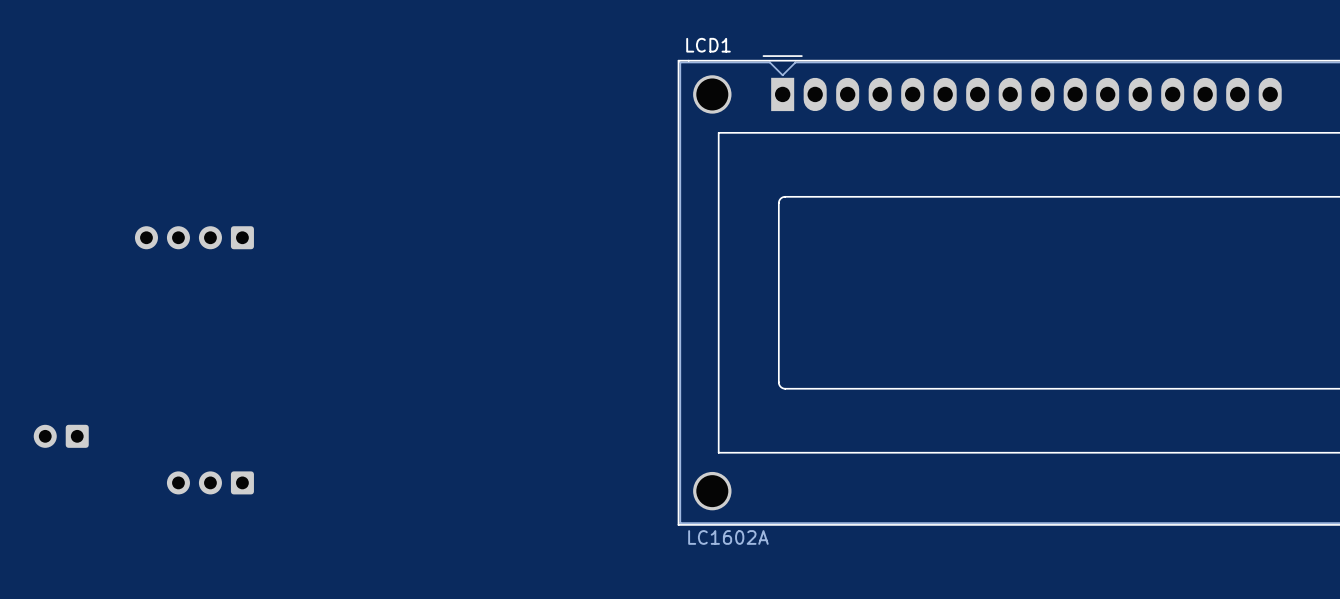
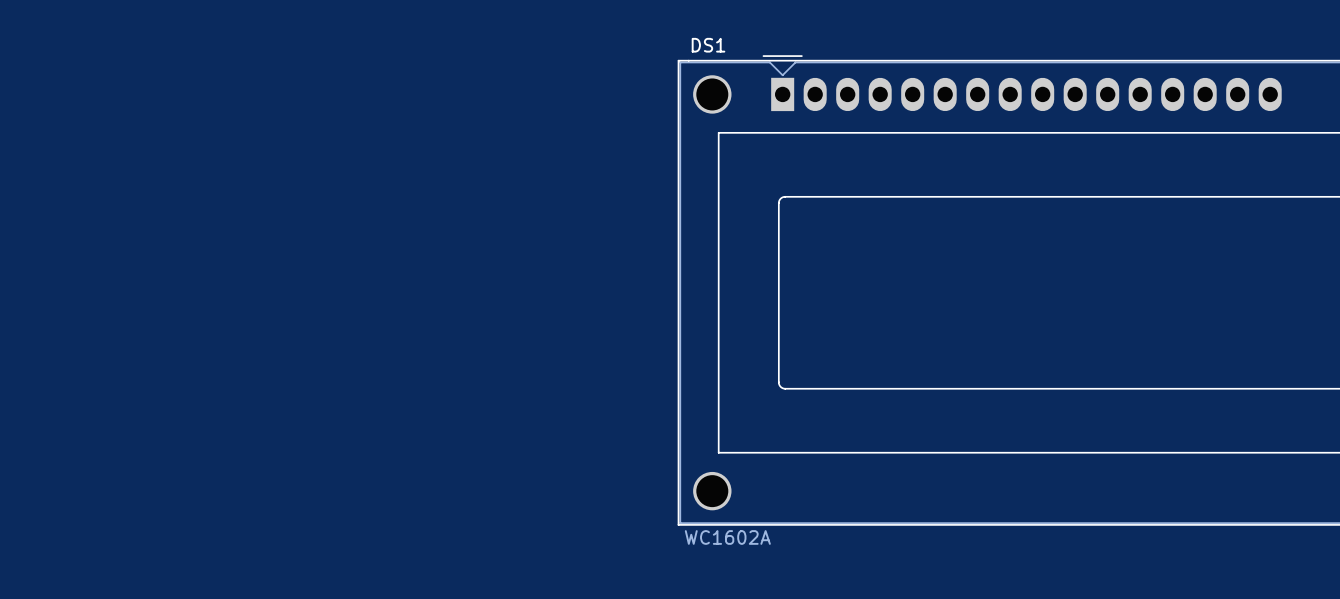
LCD1 name: LCD1 (708, 45) -> DS1 (708, 45)
part: (194, 237) -> none
part: (61, 436) -> none
part: (210, 482) -> none
LCD1 value: LC1602A (728, 537) -> WC1602A (727, 537)

